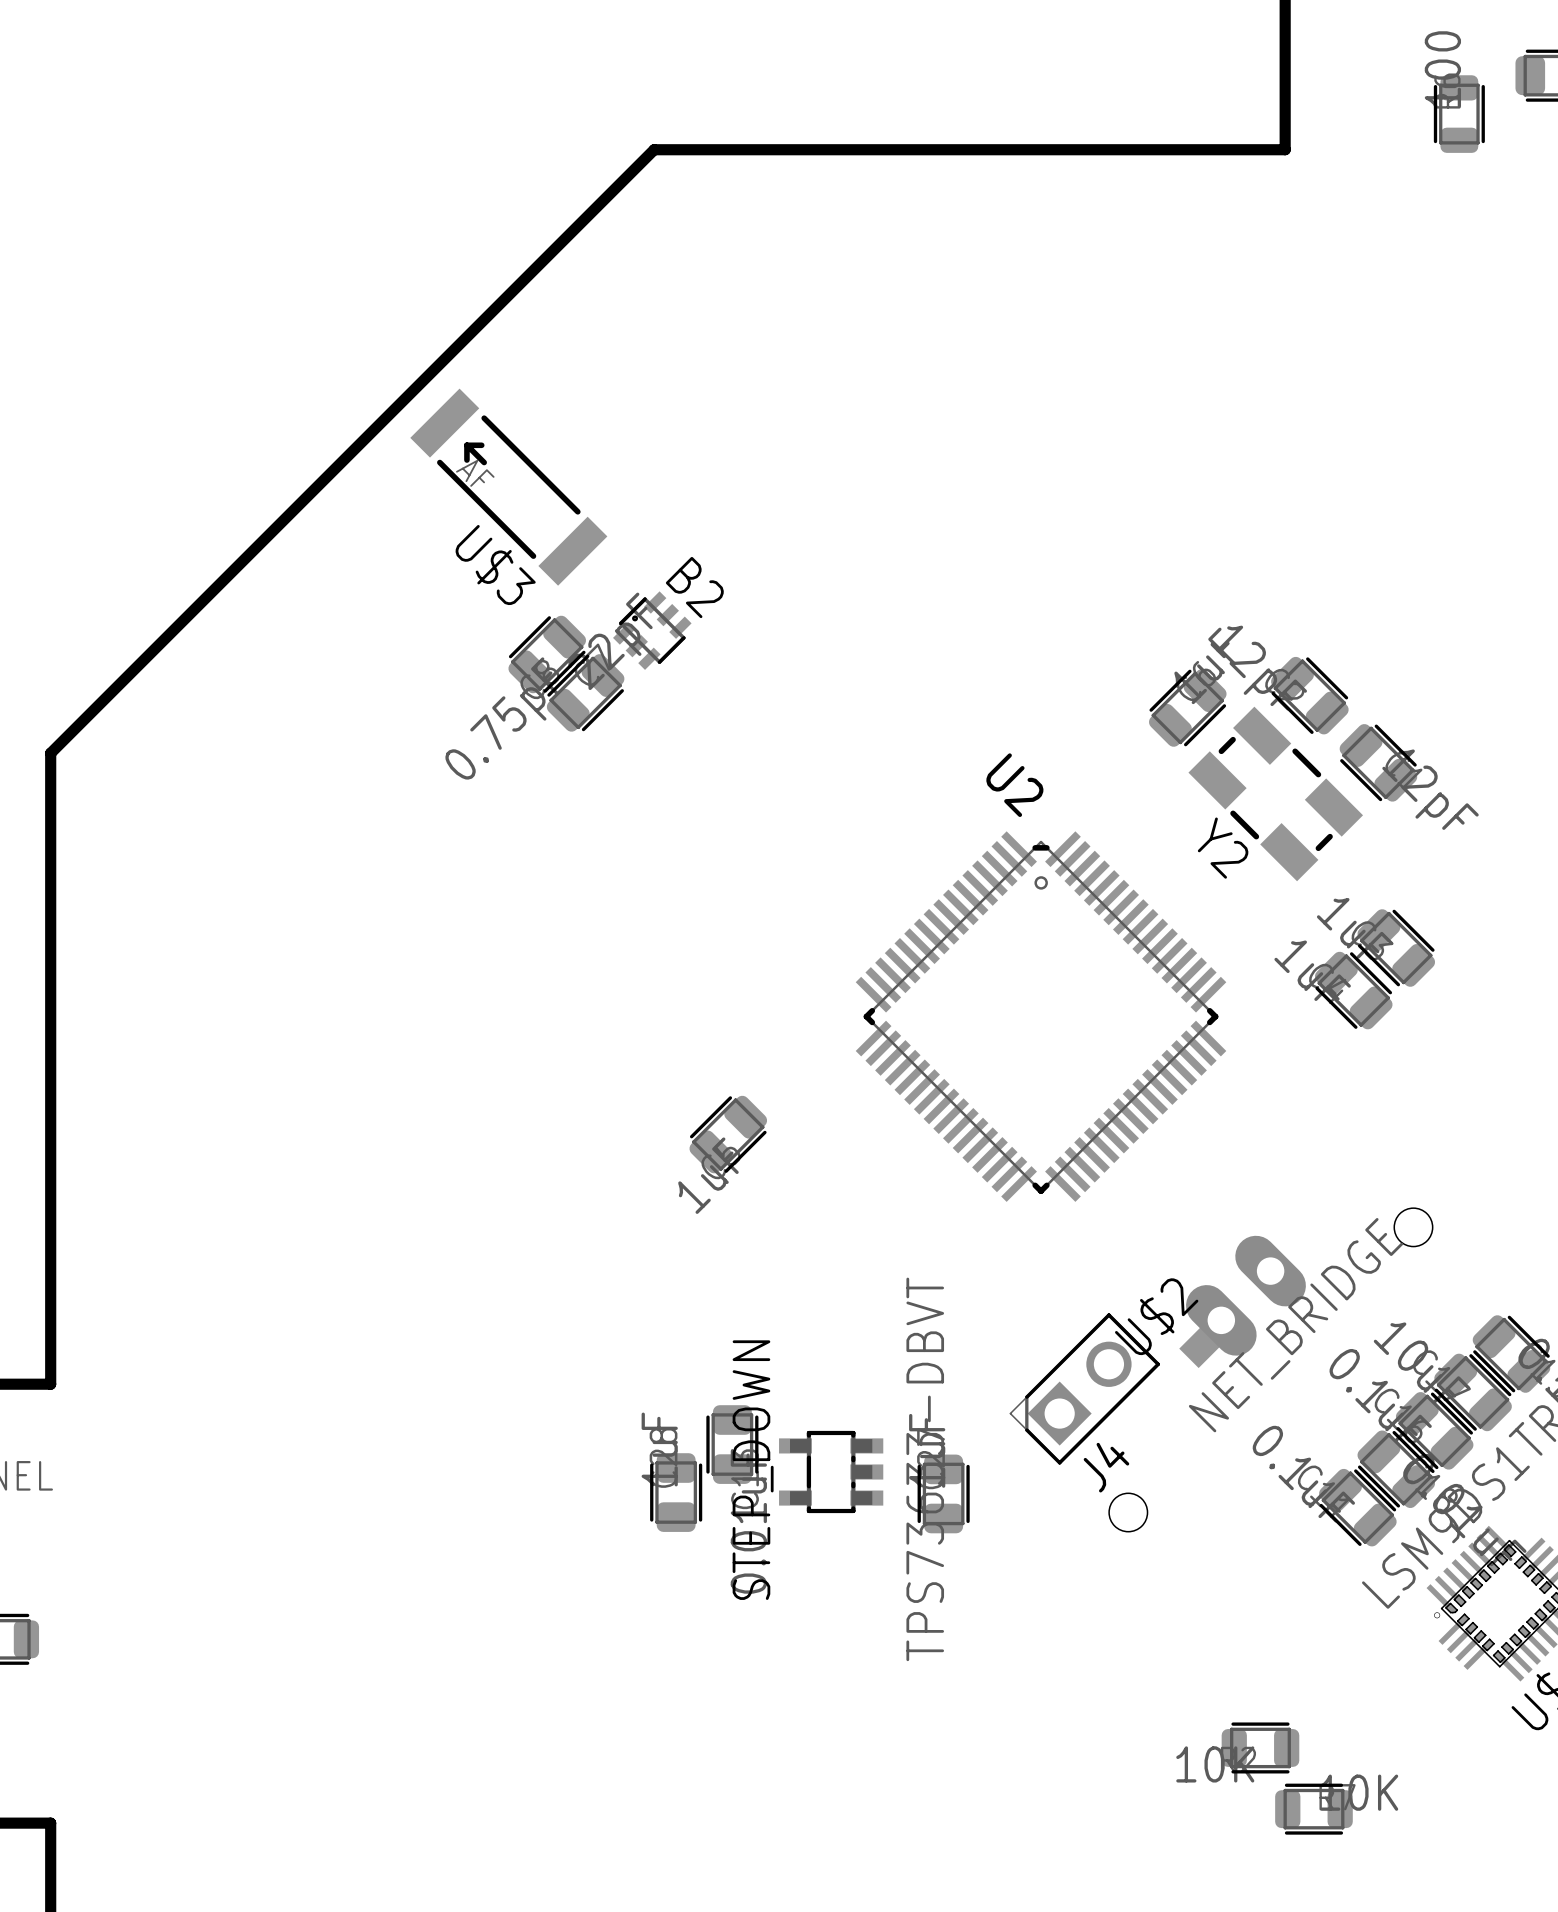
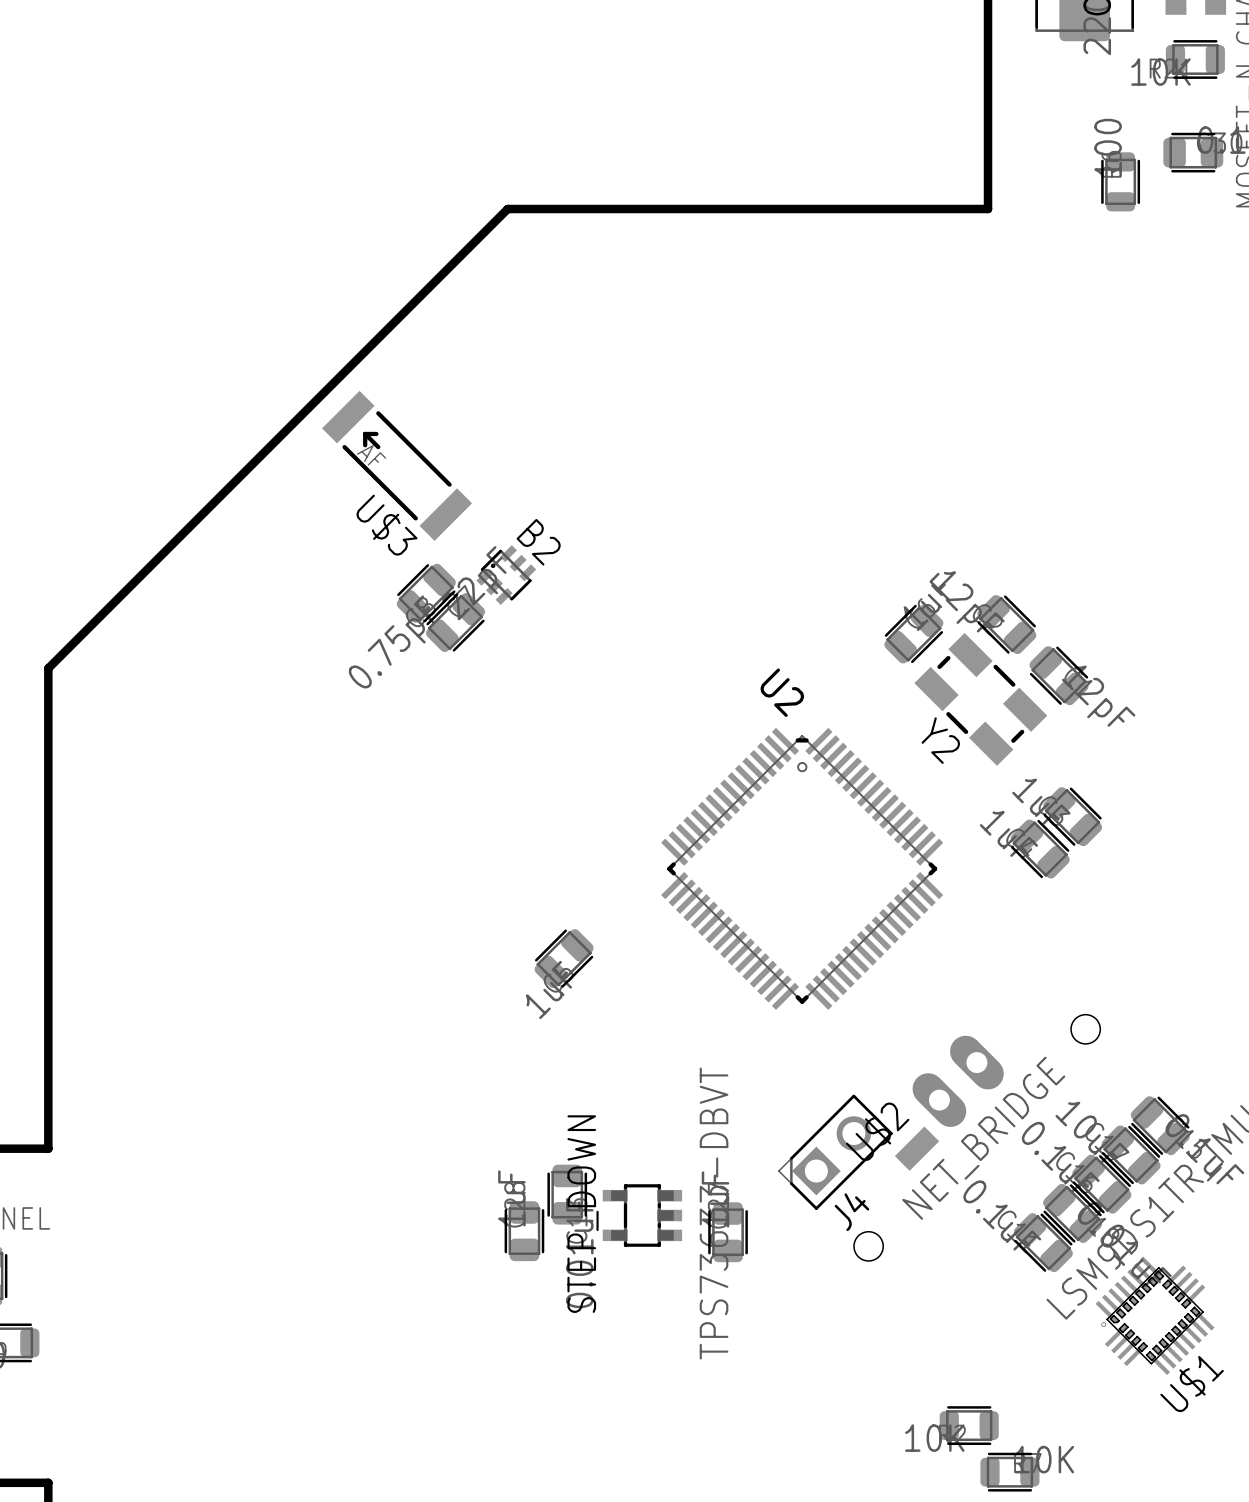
U$2 position: (1208, 1338) -> (917, 1148)

